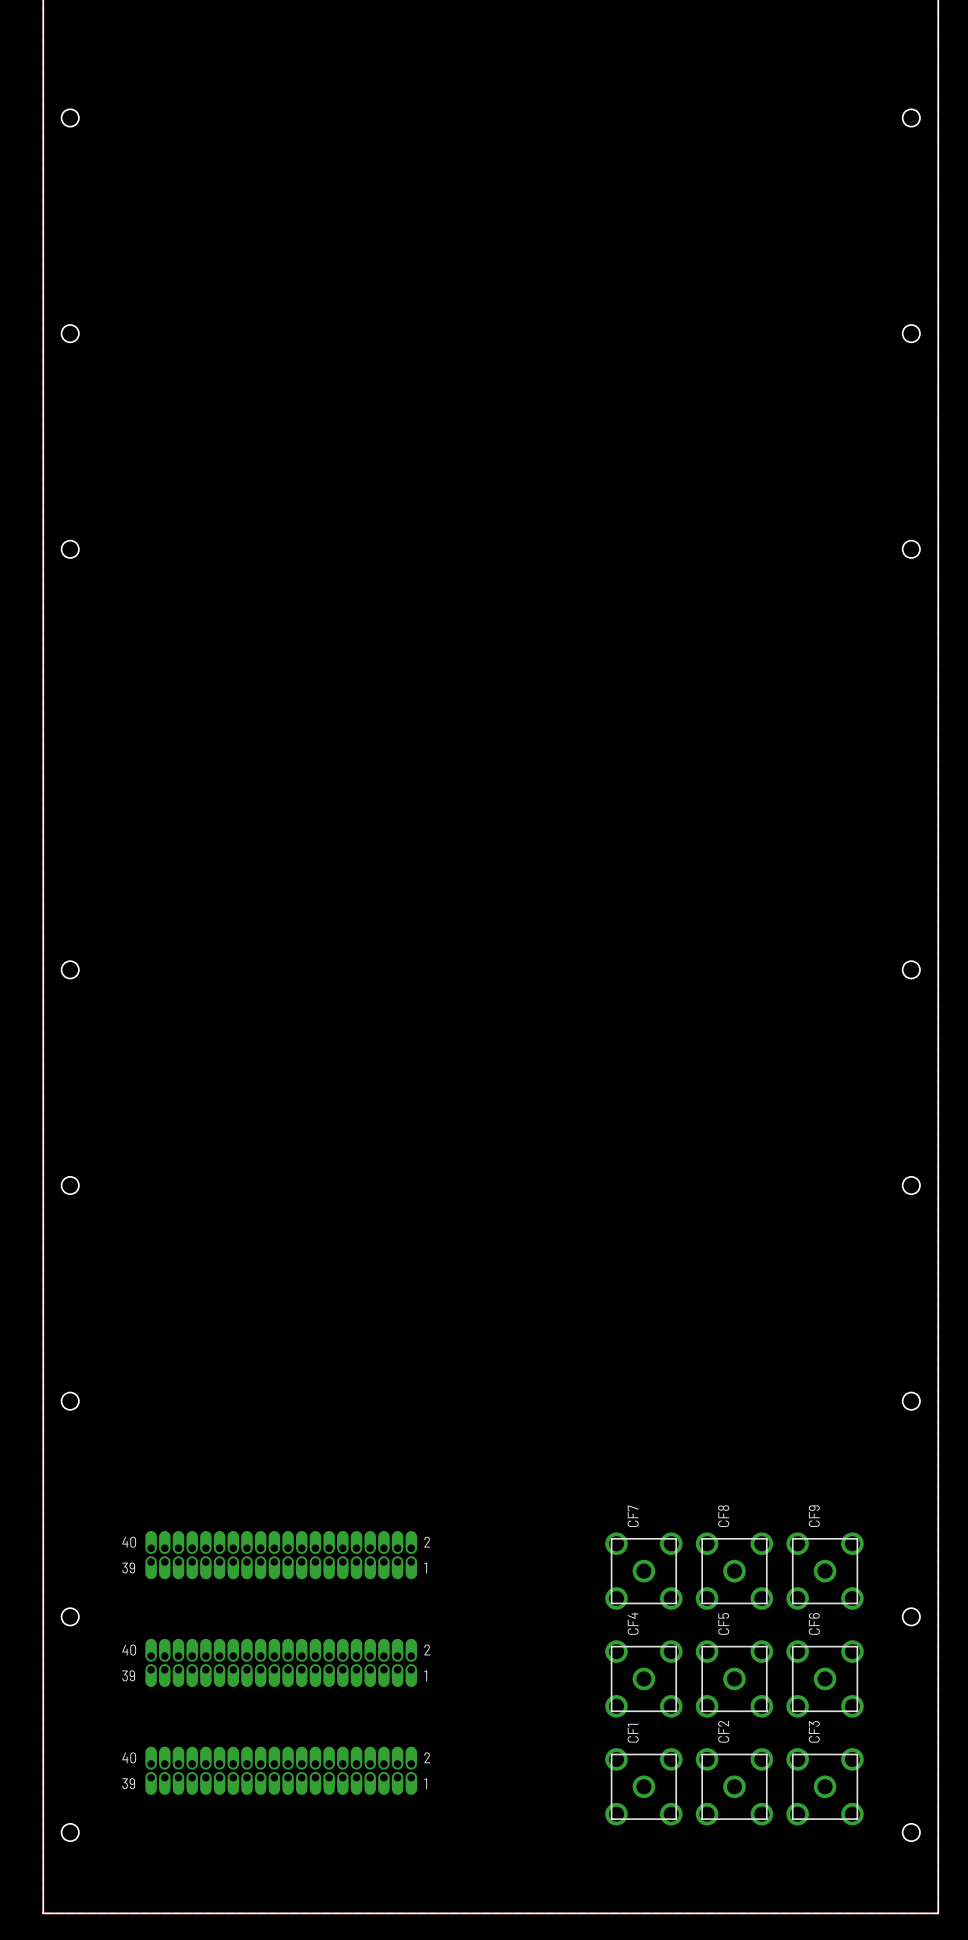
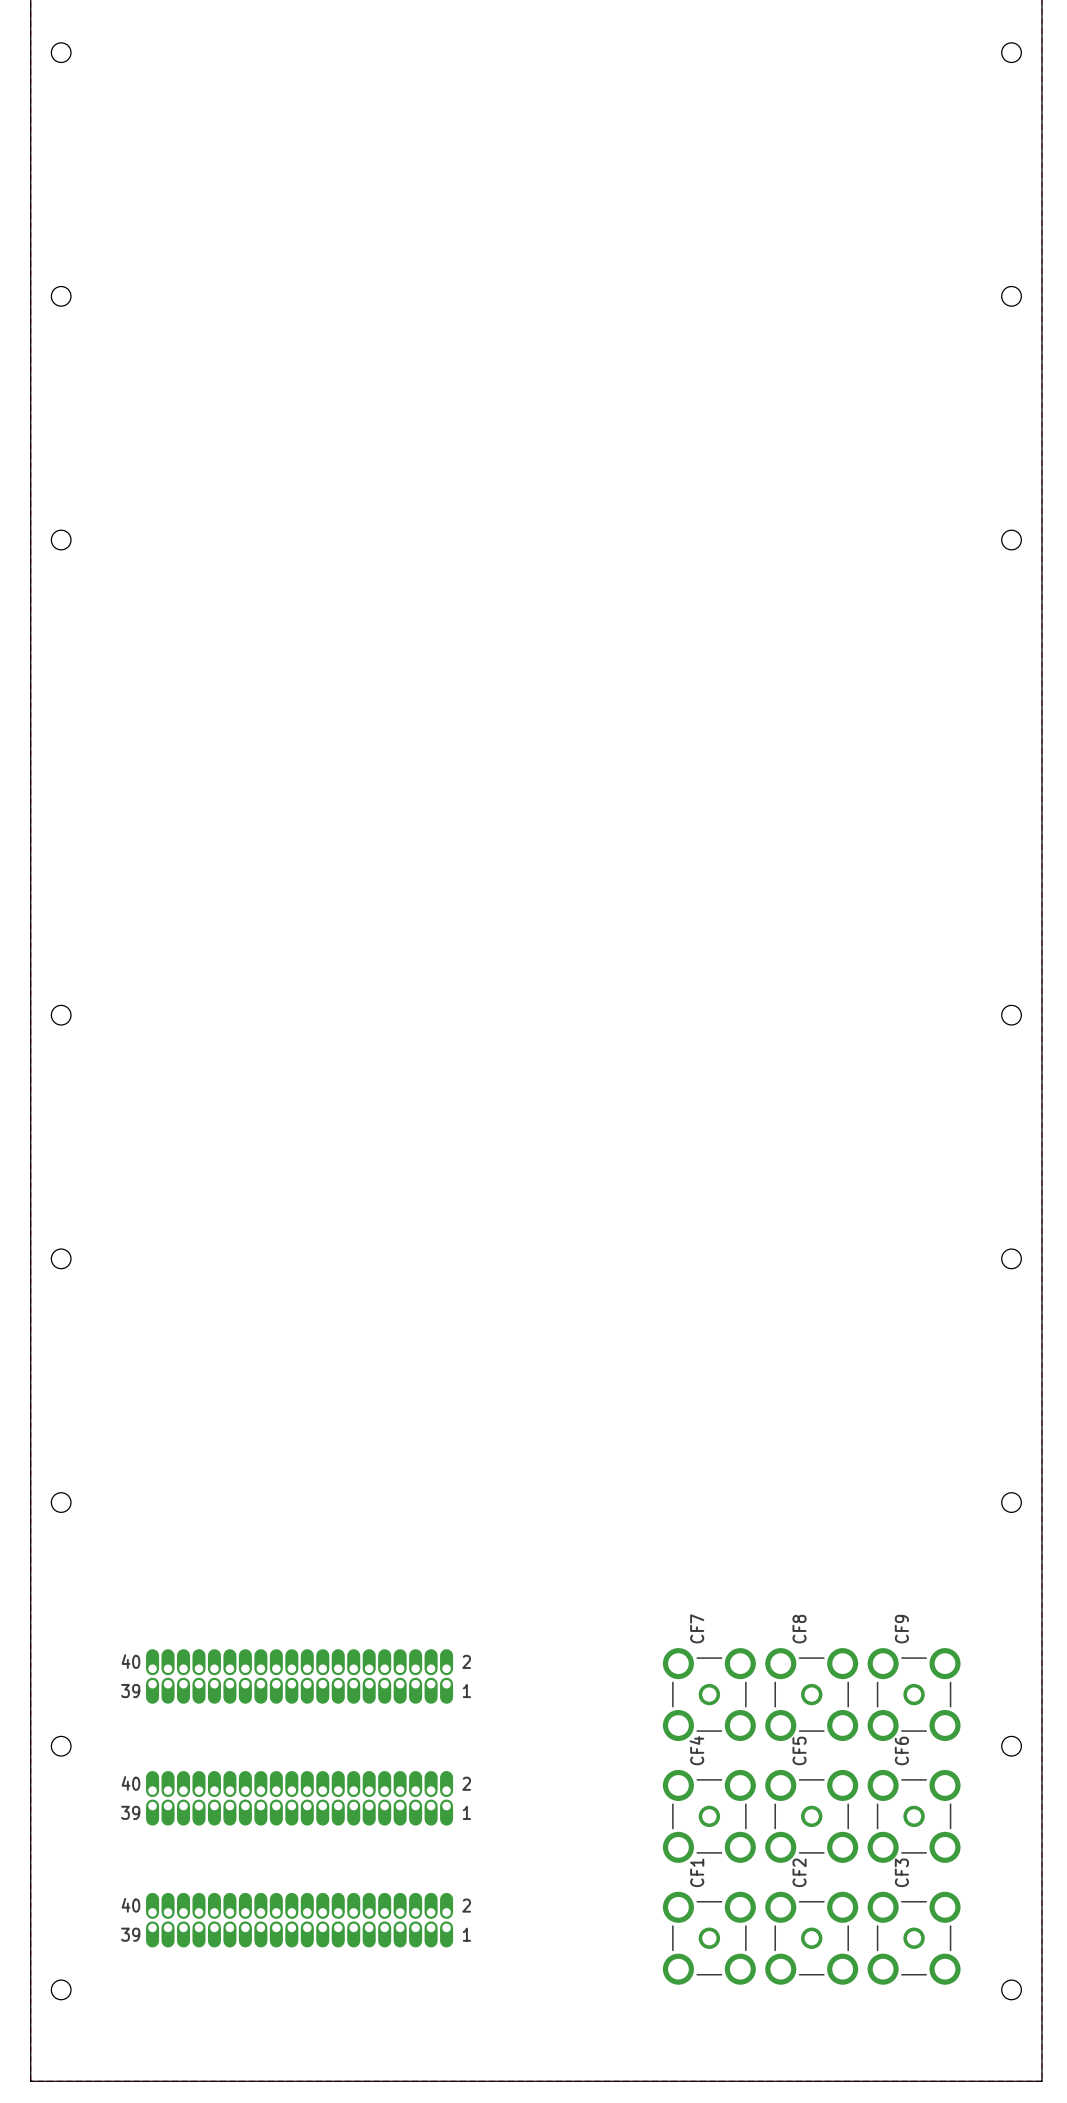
CF7 footprint: [605, 1532, 683, 1610] -> [662, 1648, 756, 1742]
CF8 footprint: [695, 1532, 774, 1610] -> [765, 1648, 859, 1742]
CF9 footprint: [786, 1532, 864, 1610] -> [867, 1648, 961, 1742]
CF4 footprint: [605, 1640, 683, 1718] -> [662, 1769, 756, 1863]
CF5 footprint: [695, 1640, 774, 1718] -> [765, 1769, 859, 1863]
CF6 footprint: [786, 1640, 864, 1718] -> [867, 1769, 961, 1863]
CF1 footprint: [605, 1748, 683, 1826] -> [662, 1891, 756, 1985]
CF2 footprint: [695, 1748, 774, 1826] -> [765, 1891, 859, 1985]
CF3 footprint: [786, 1748, 864, 1826] -> [867, 1891, 961, 1985]

